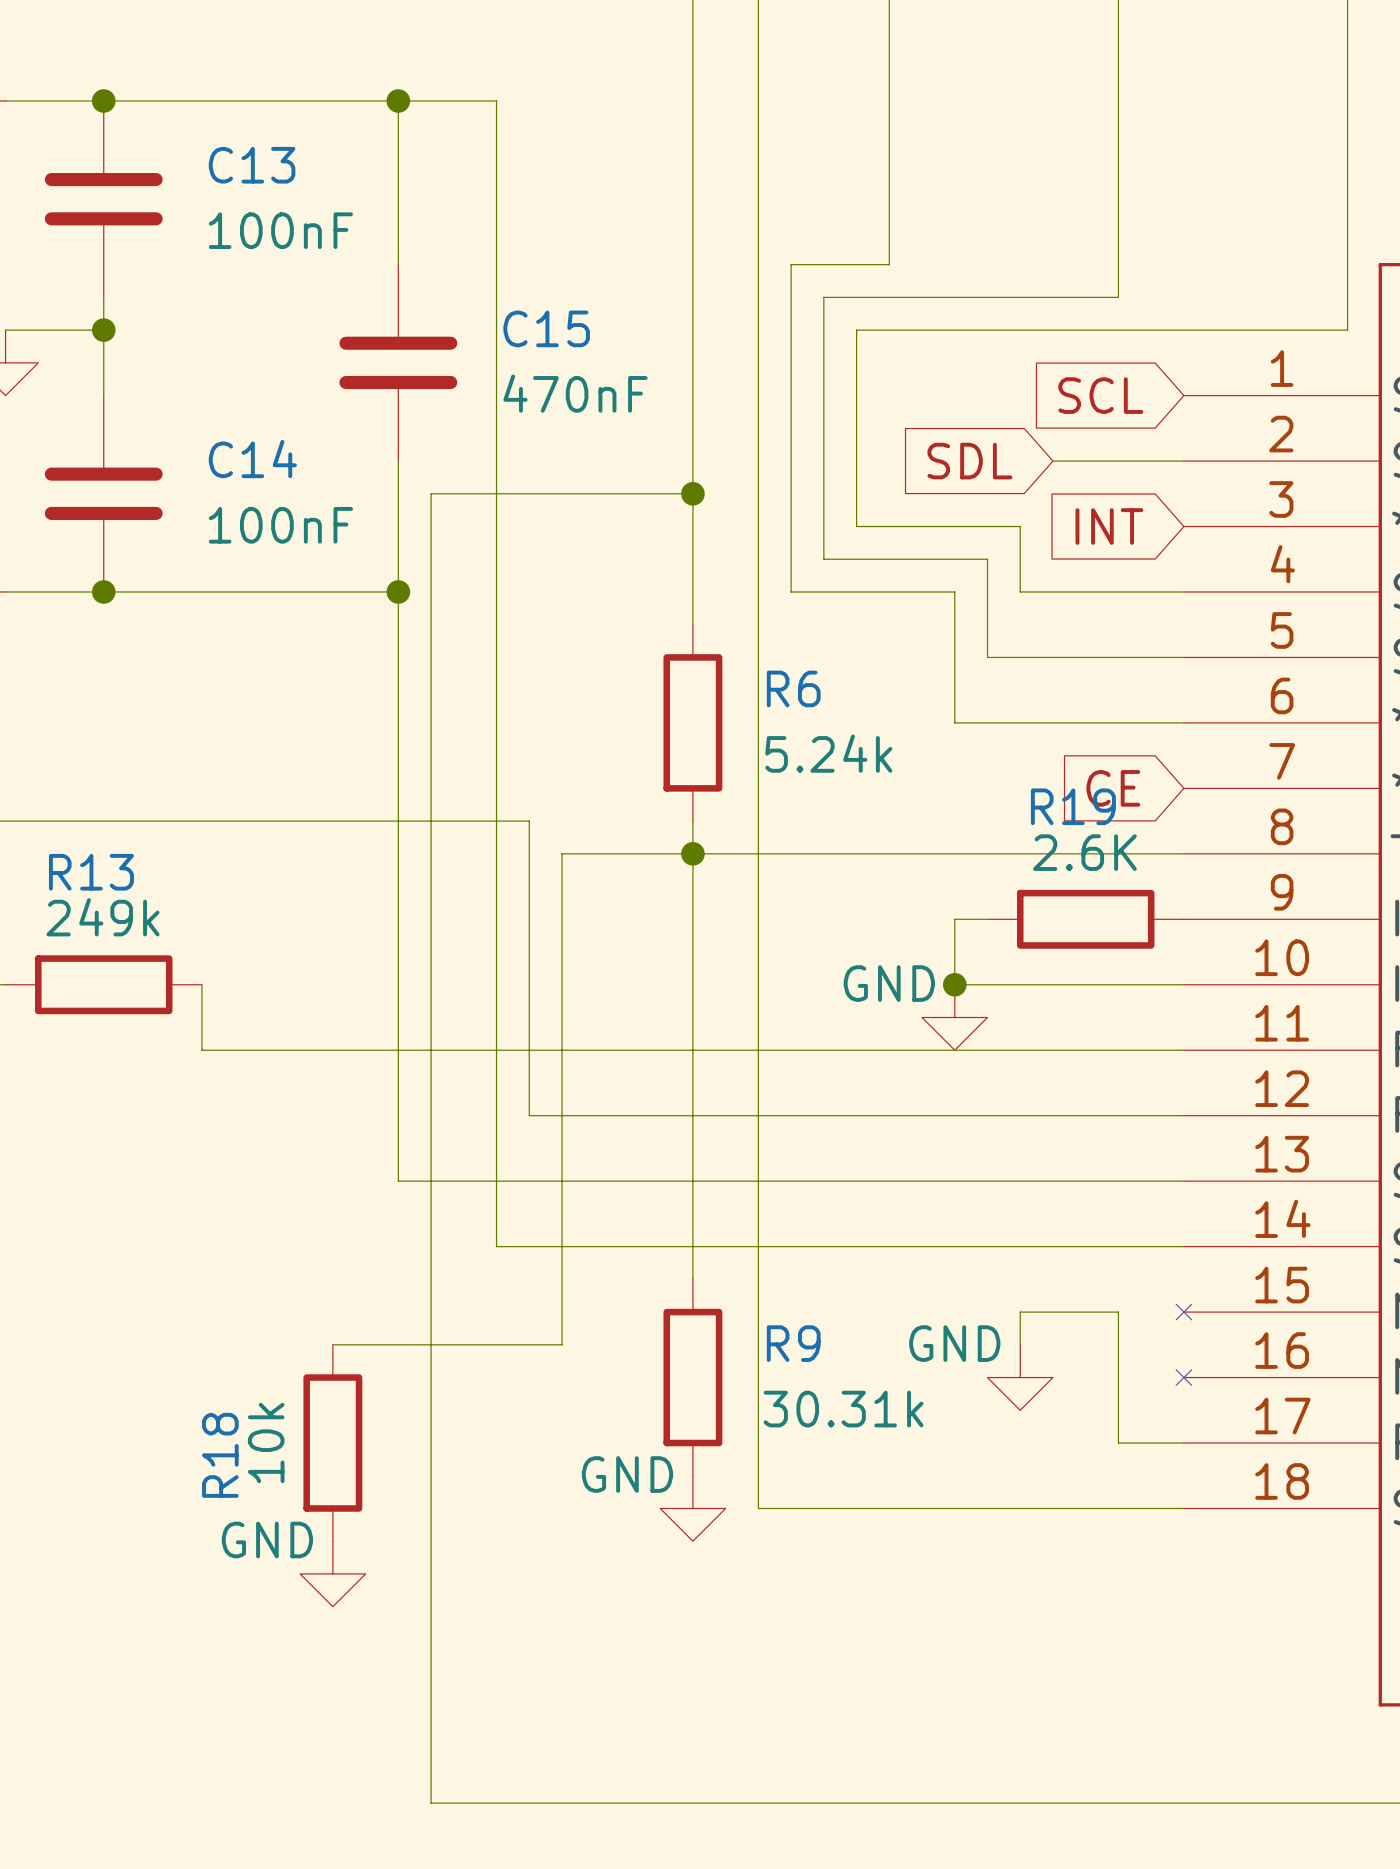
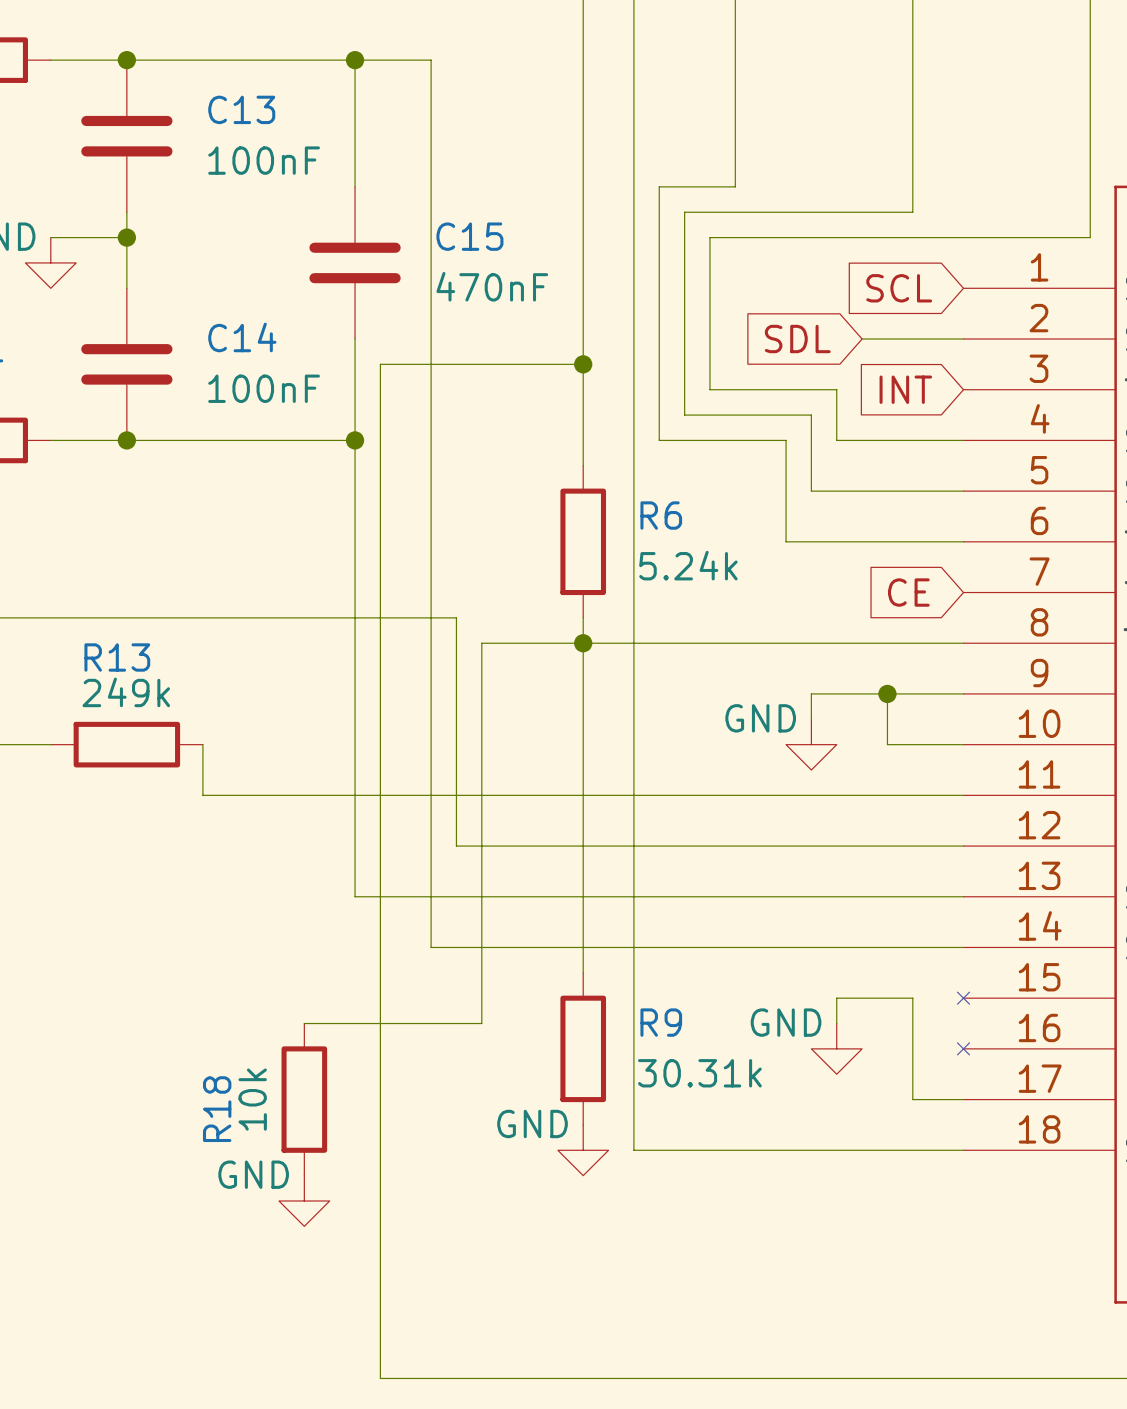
wire: (987, 919) (954, 919) (954, 984) (1085, 984) -> (887, 693) (887, 744)
R19: 2.6K (1085, 919) -> none
wire: none -> (963, 693) (811, 693) (811, 719)
junction position: (954, 984) -> (887, 693)
power symbol position: GND (954, 1017) -> GND (811, 744)

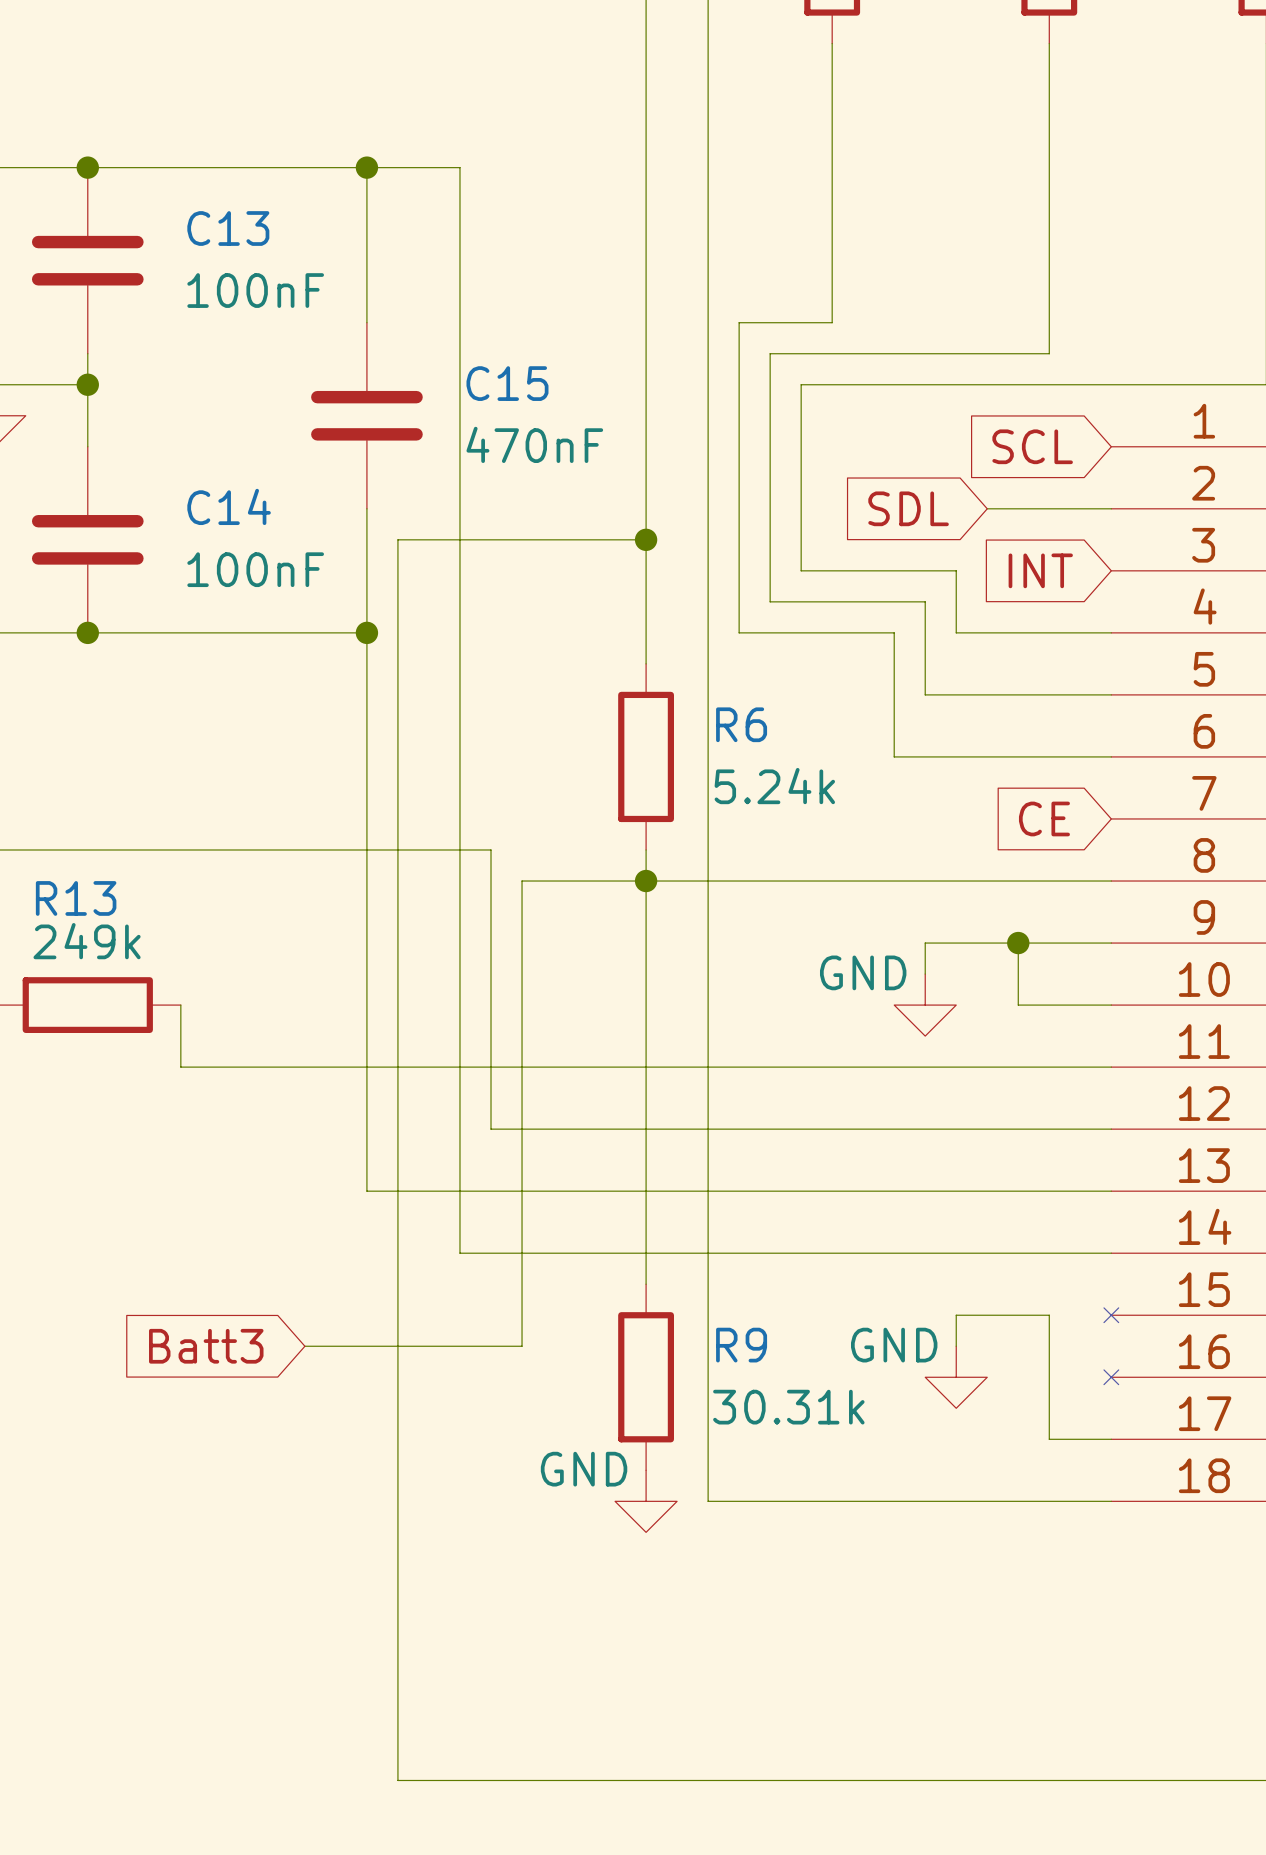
global label: none -> Batt3 (206, 1346)
R18: 10k (304, 1099) -> none
power symbol: GND (304, 1200) -> none

